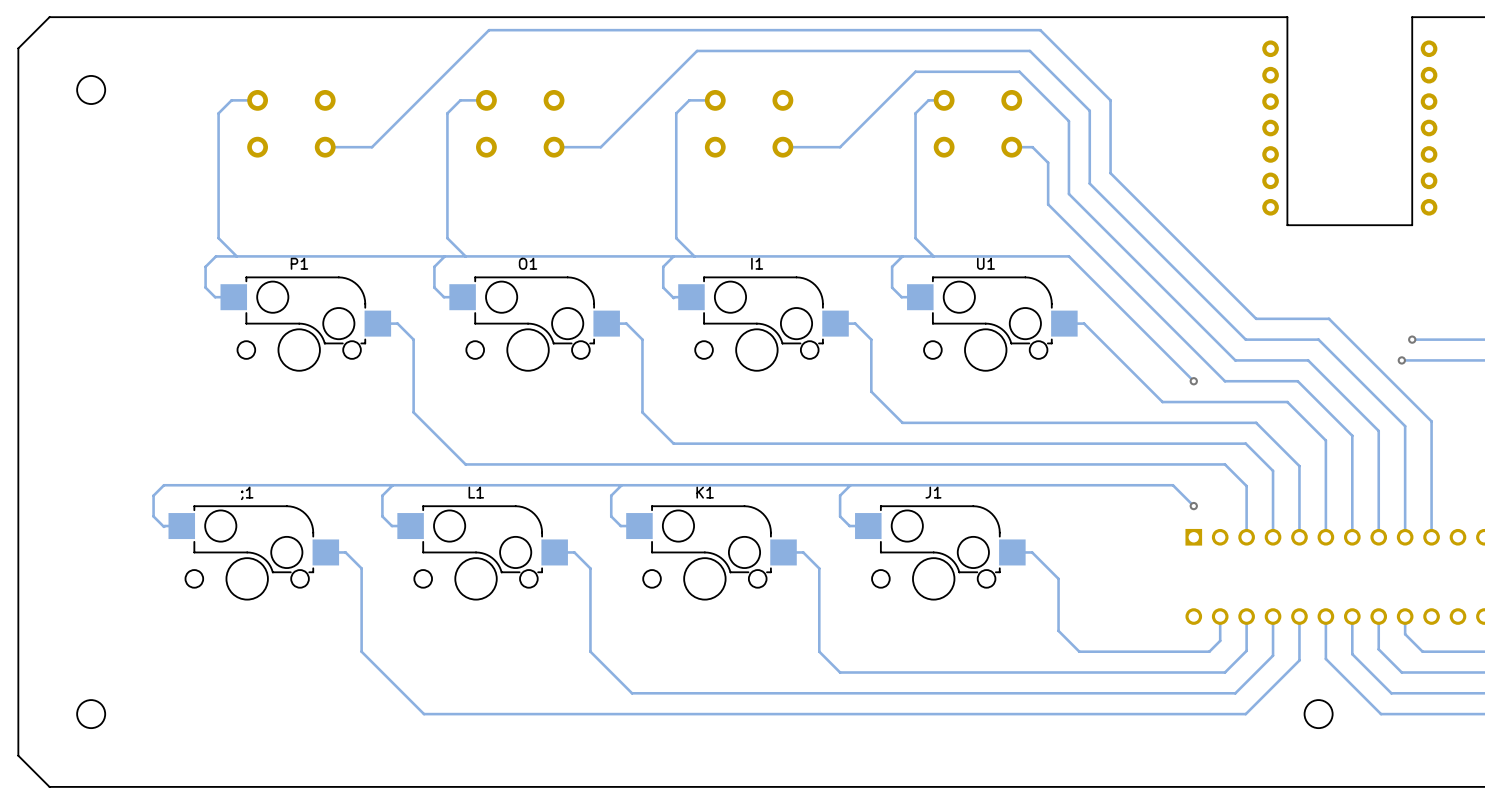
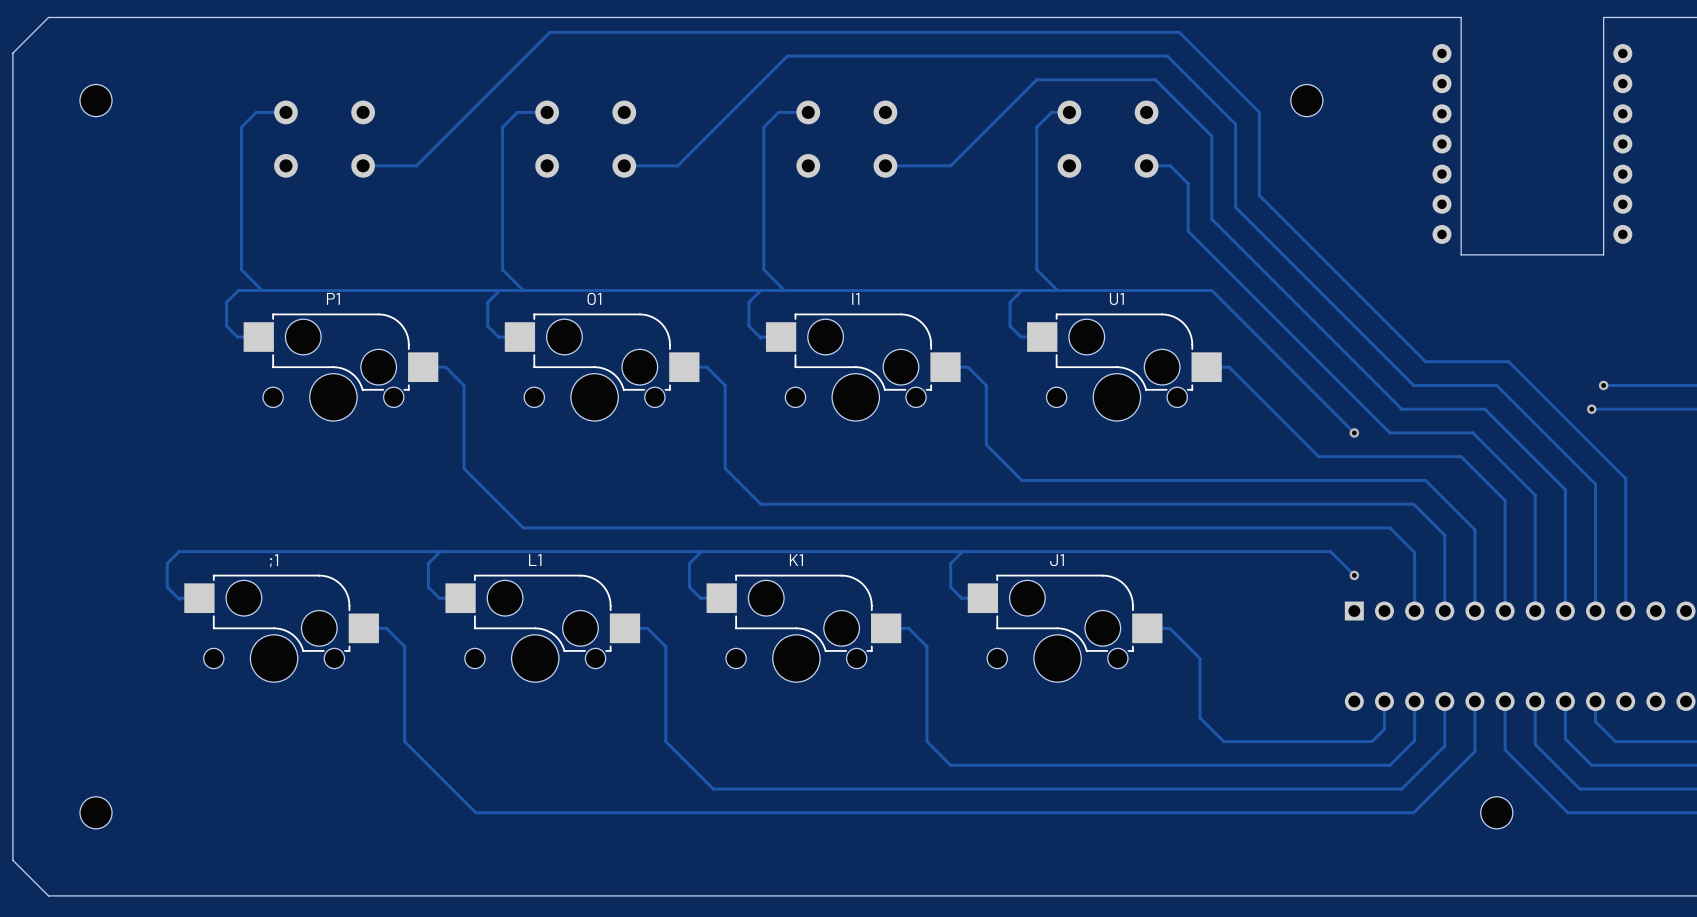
part: none -> (1306, 100)

